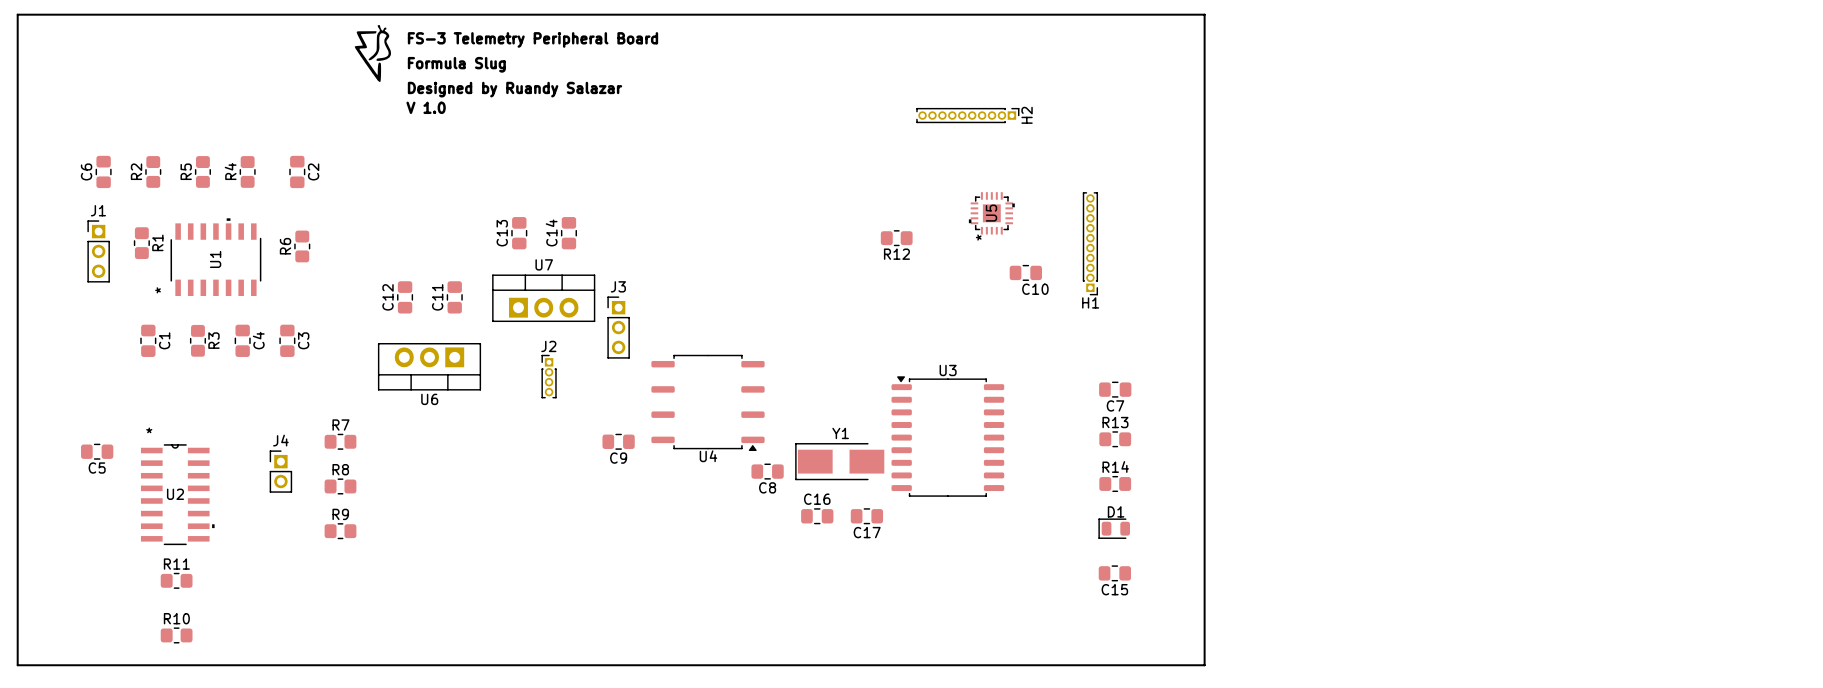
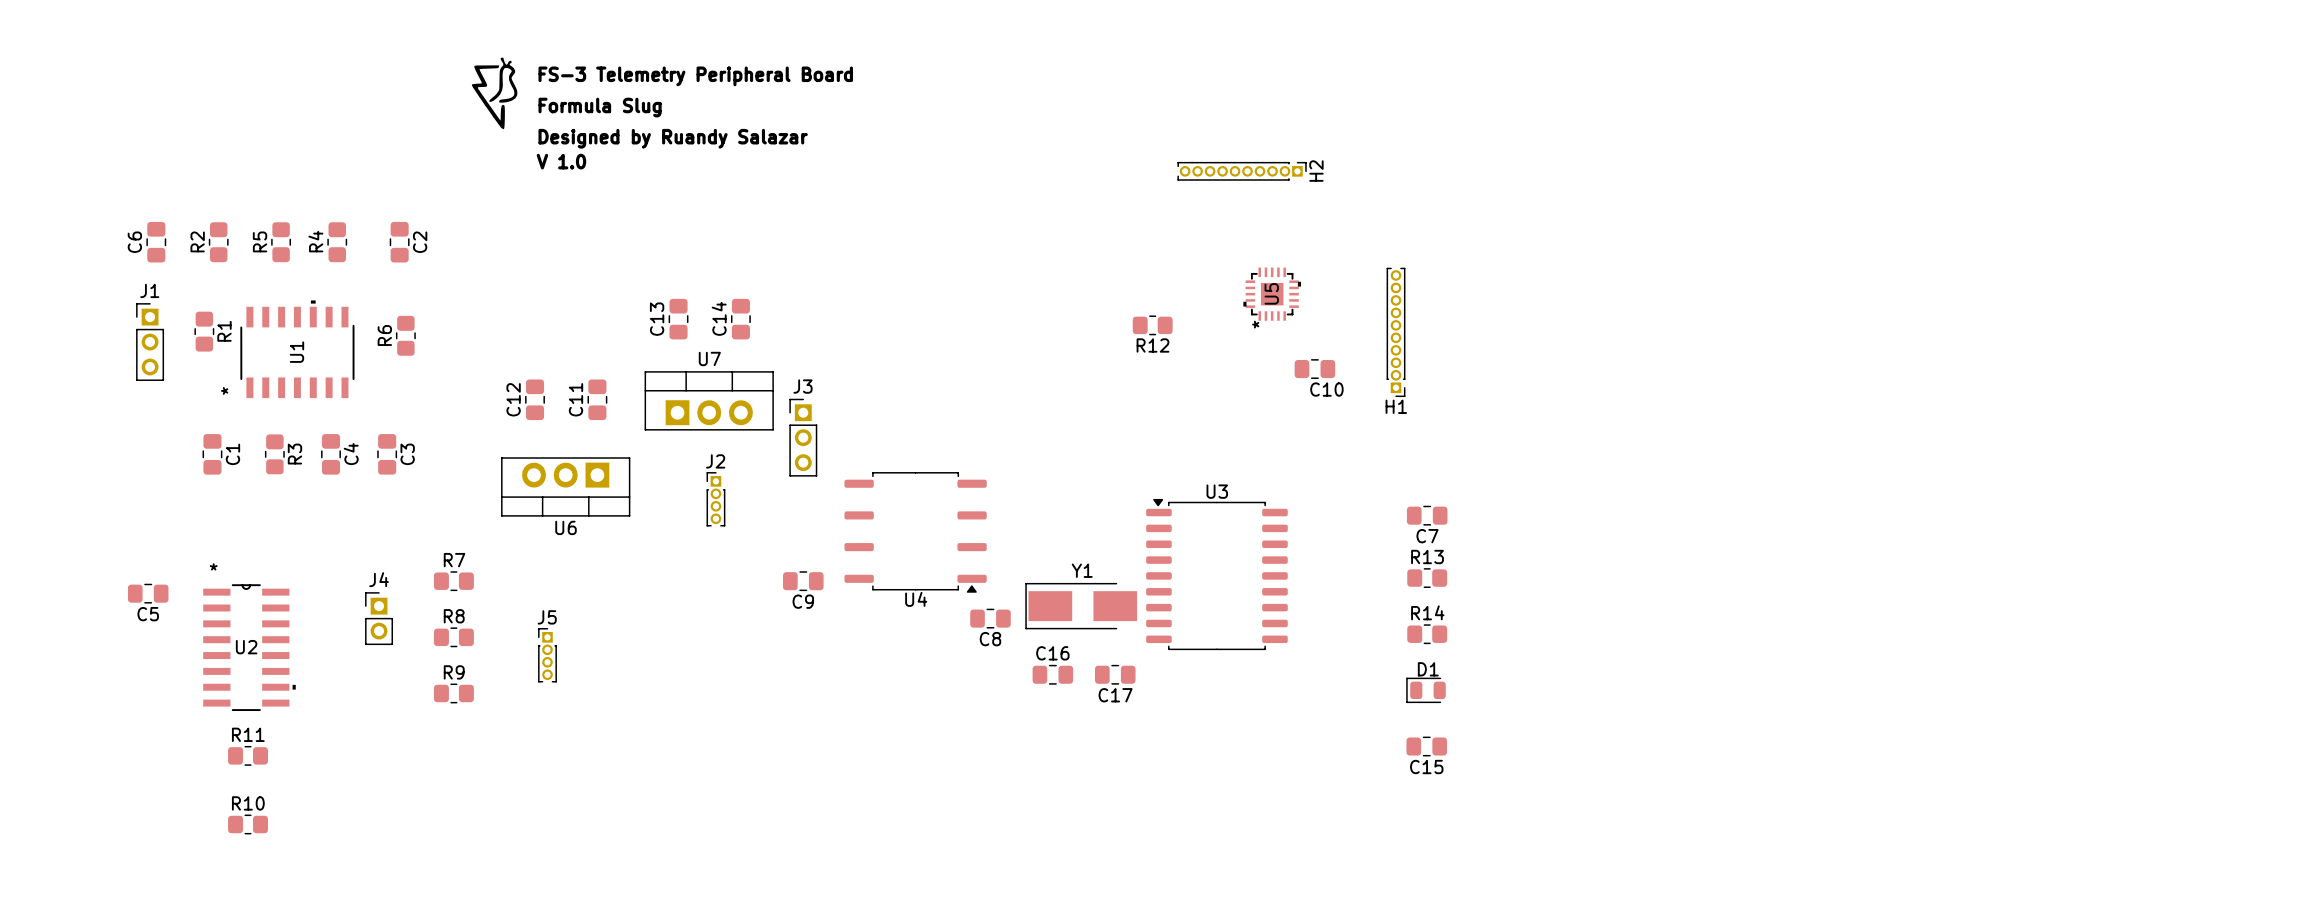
board edge: (17, 14) (1204, 14) (1204, 665) (17, 665) (17, 14) -> none
J5: none -> (547, 655)

